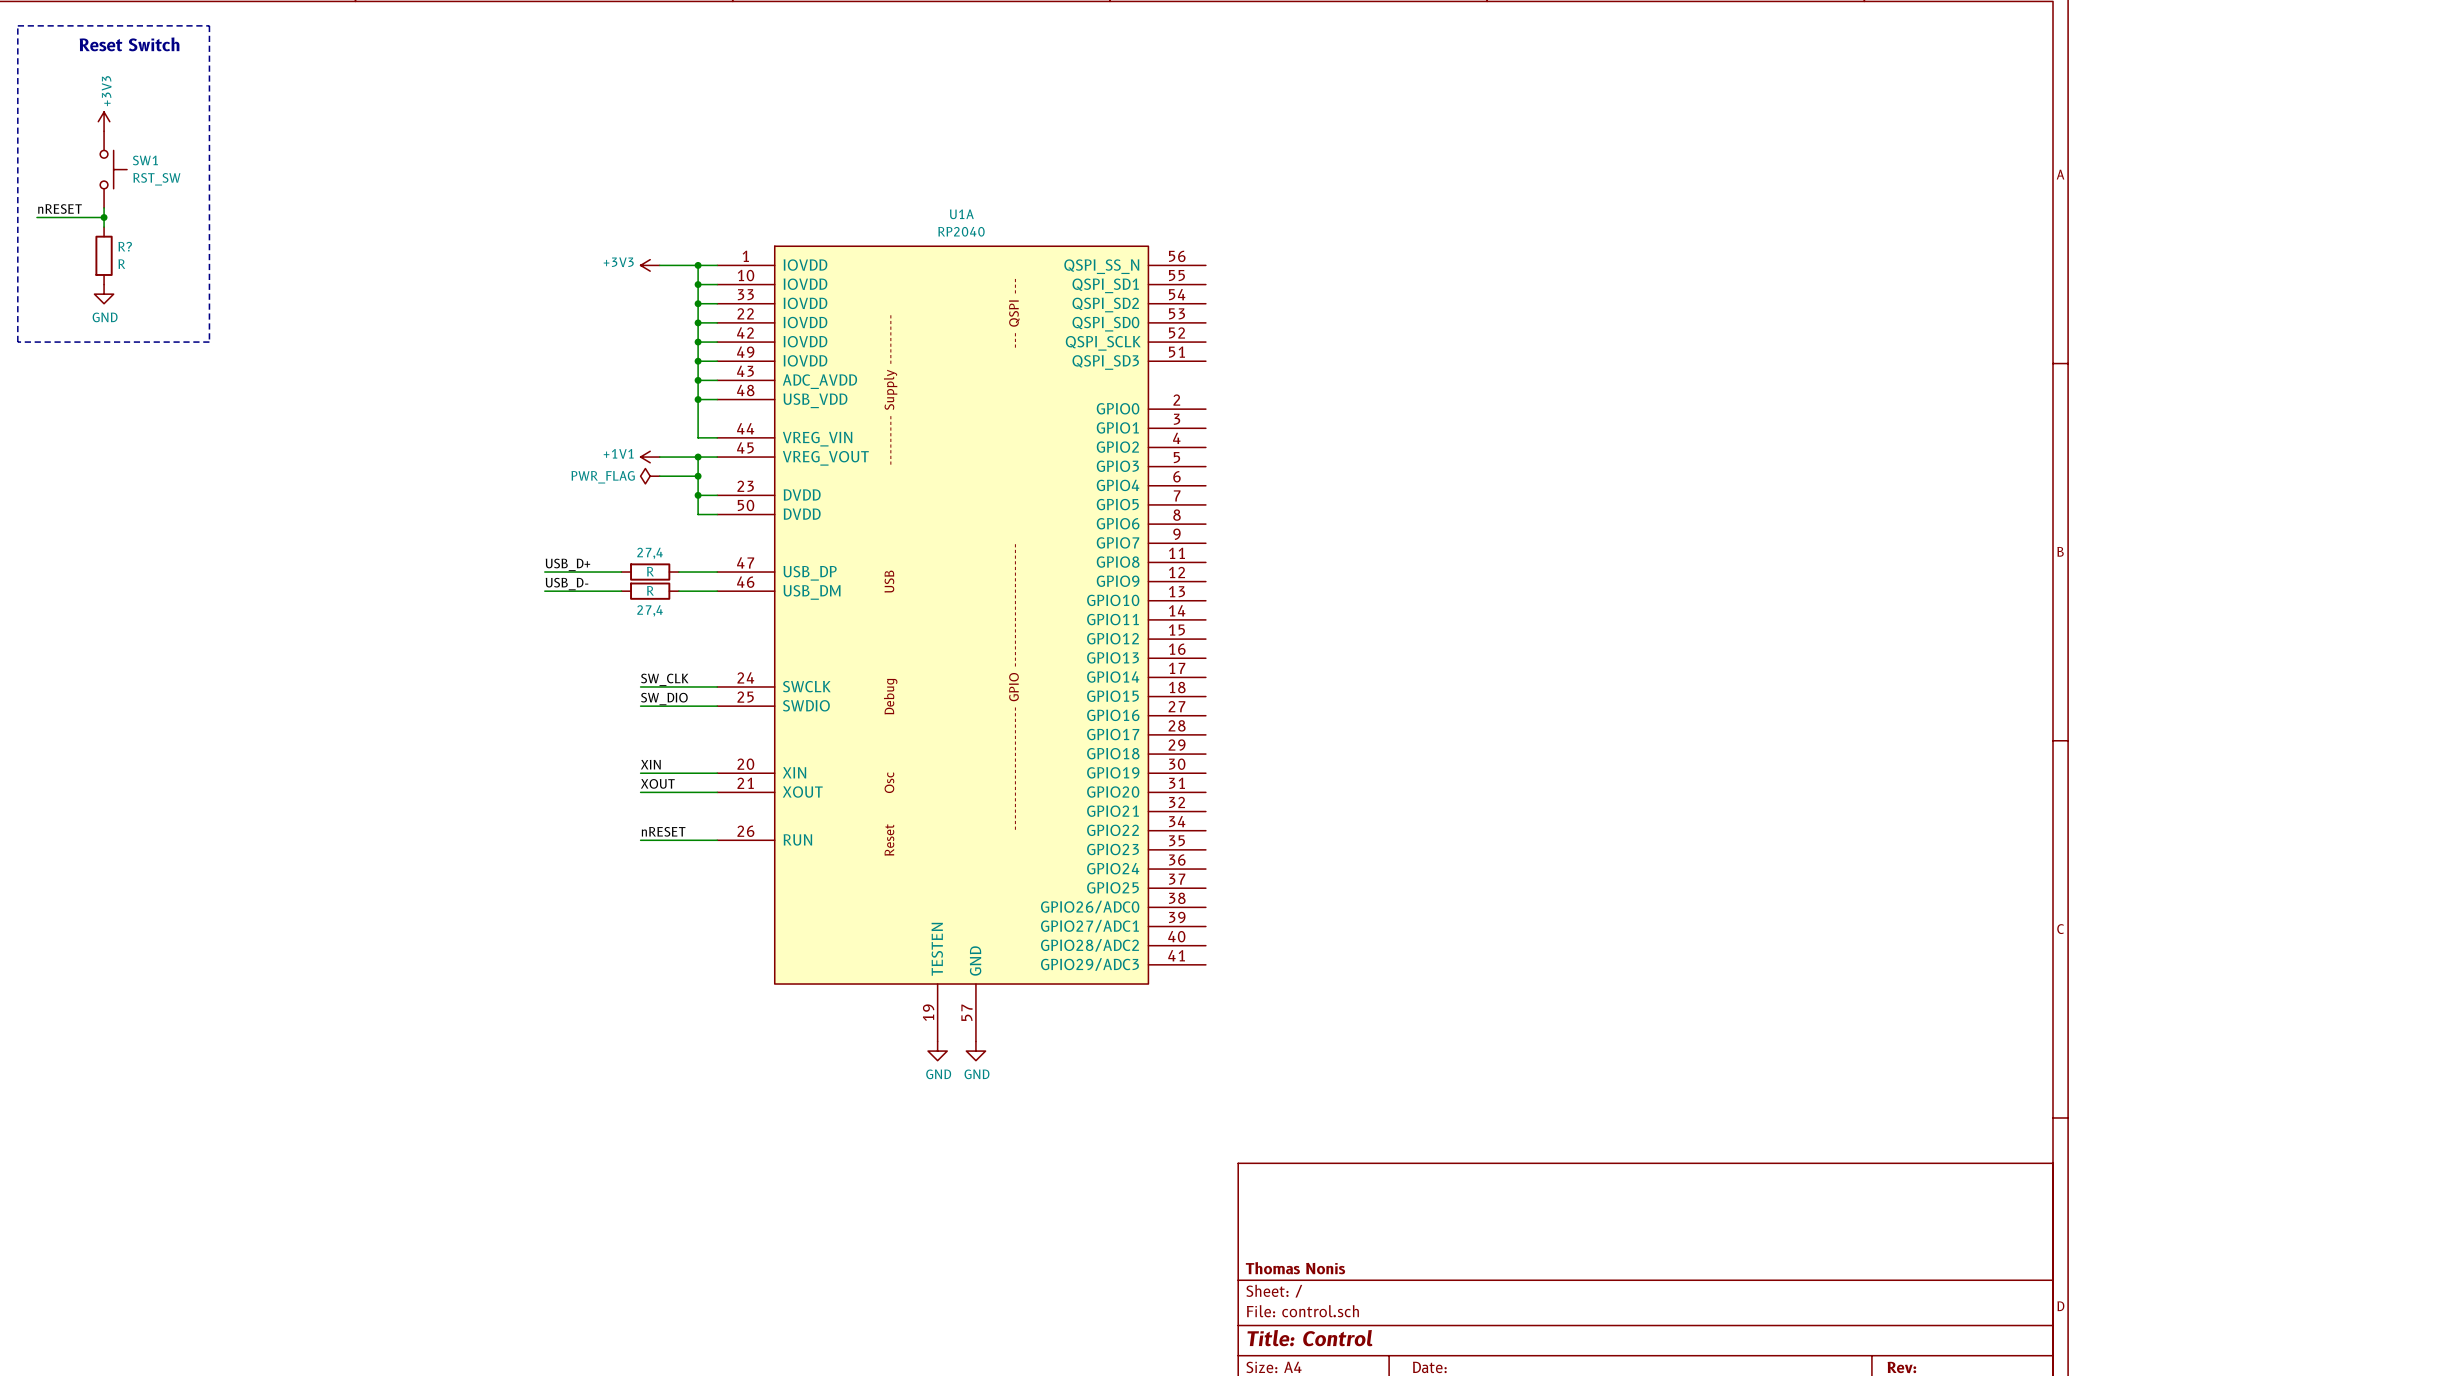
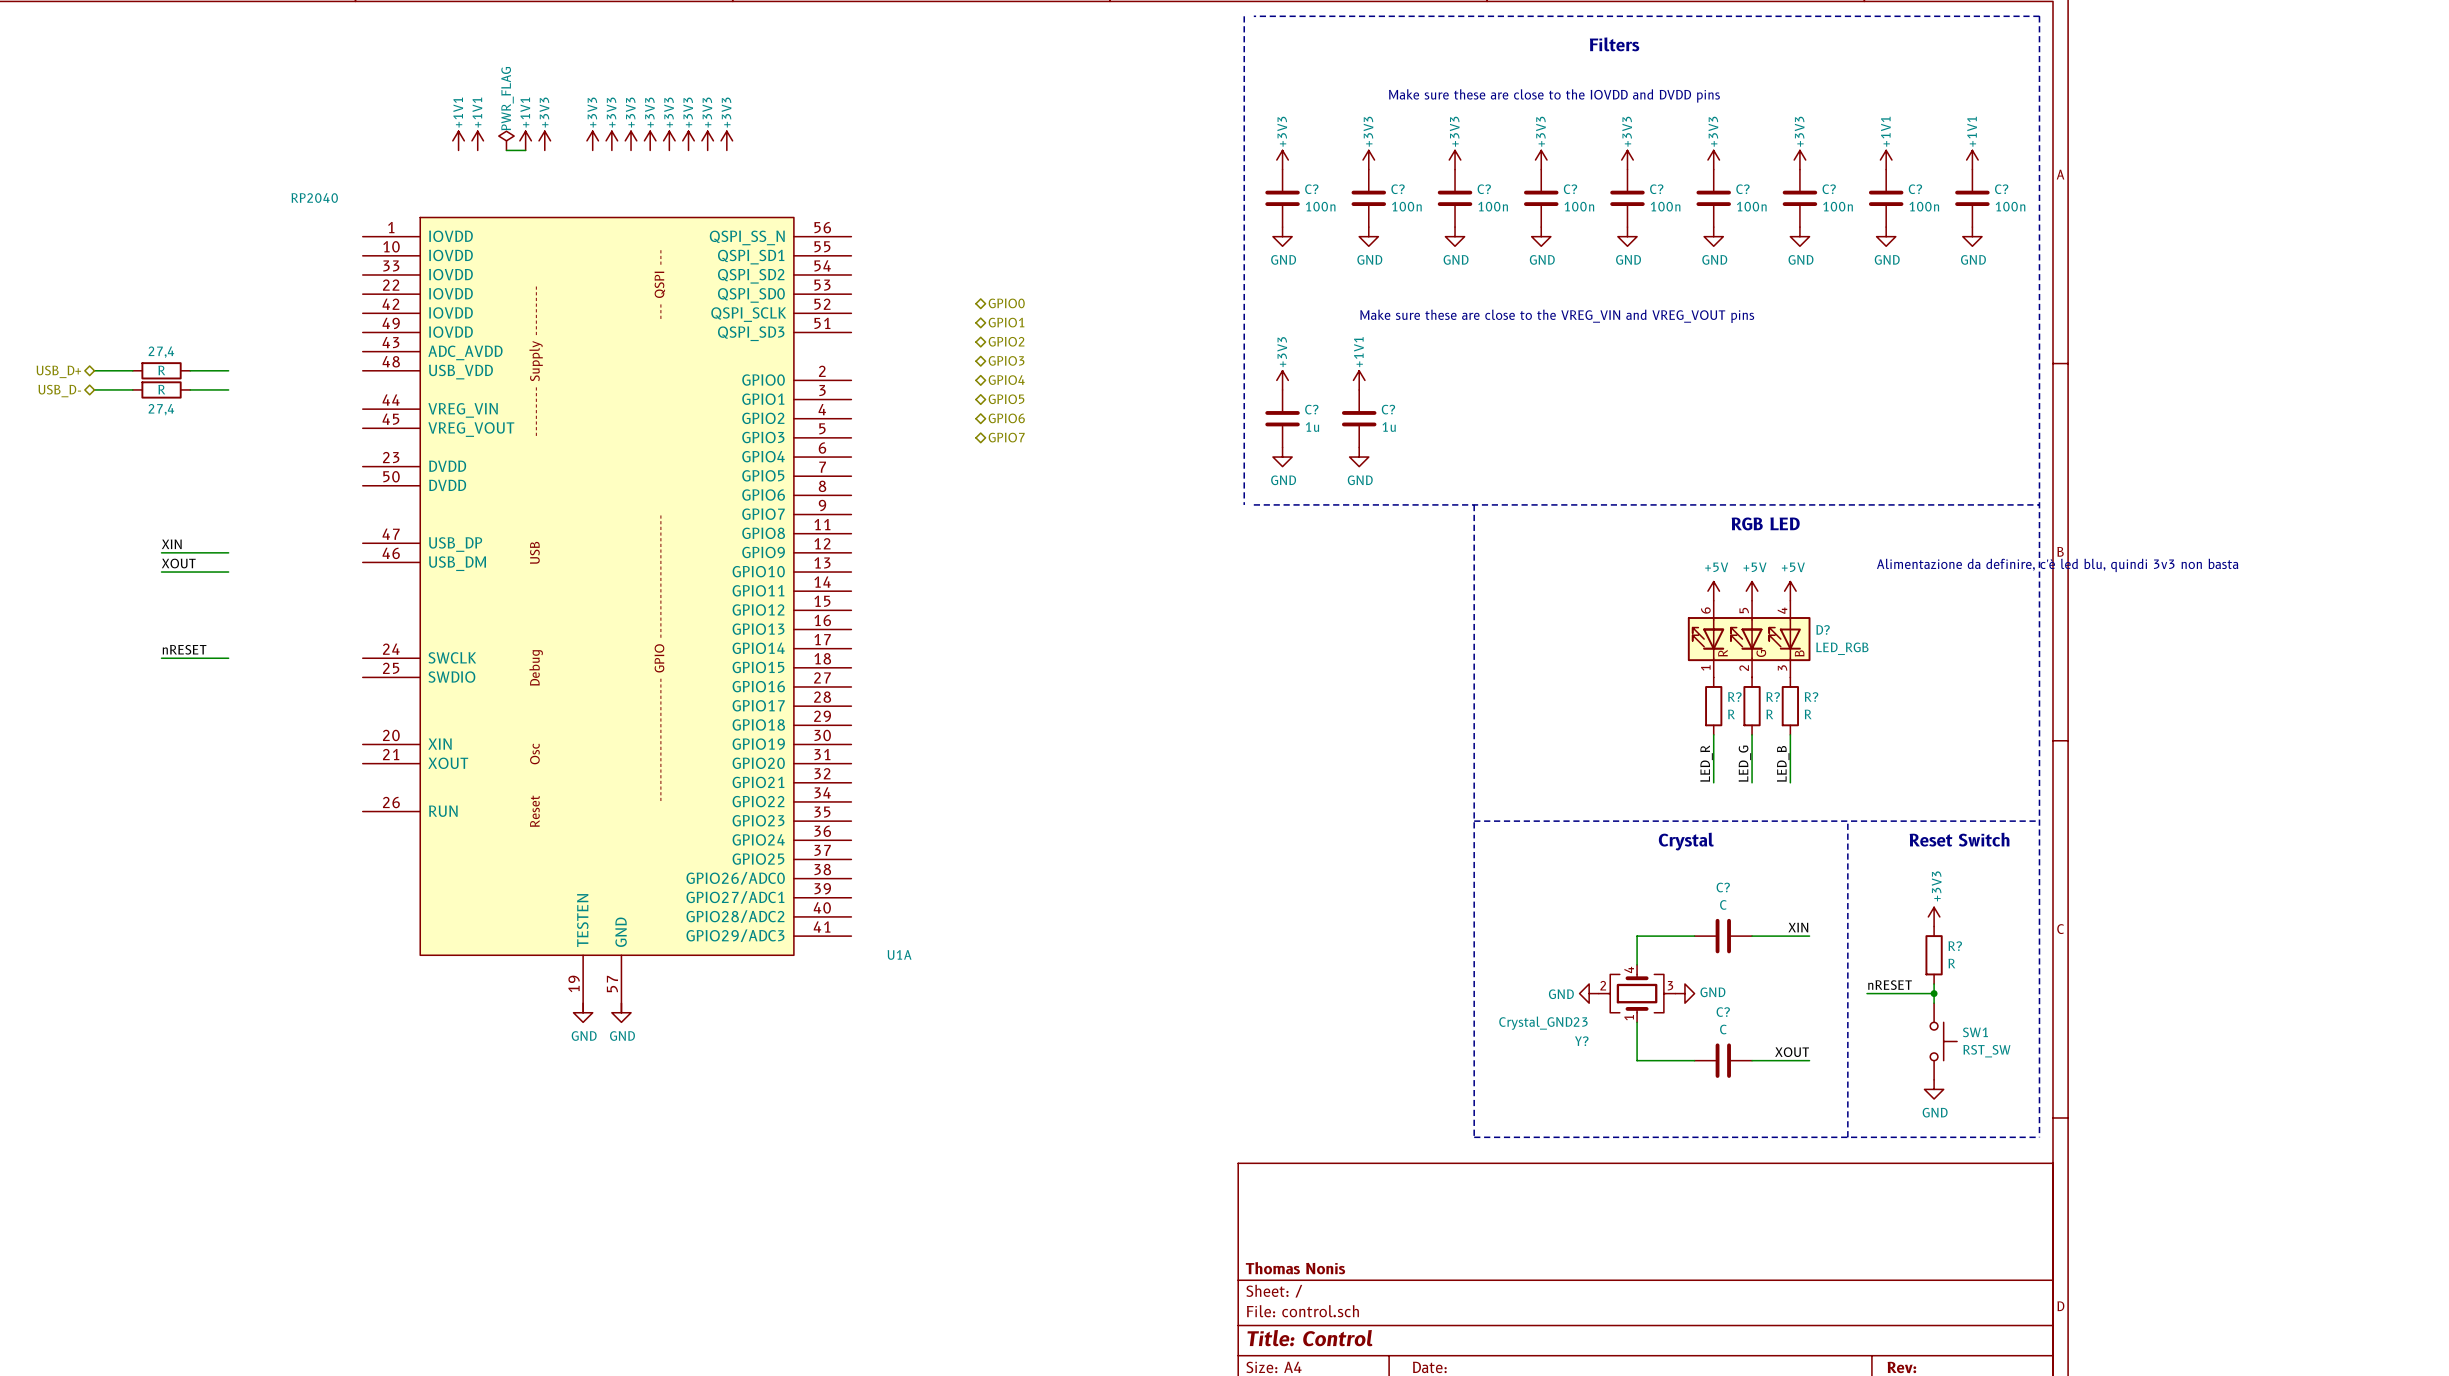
line: none -> (1244, 16) (1244, 504)
line: none -> (1253, 16) (2039, 16) (2039, 1137) (1474, 1137) (1474, 504)
line: (17, 25) (209, 25) (209, 342) (17, 342) (17, 25) -> none
text: Reset Switch (129, 44) -> none
text: none -> Filters (1614, 44)
text: none -> Make sure these are close to the IOVDD and DVDD pins (1554, 95)
power symbol: +3V3 (104, 121) -> none
power symbol: none -> +1V1 (458, 140)
power symbol: none -> +1V1 (477, 140)
power symbol: none -> PWR_FLAG (506, 140)
power symbol: none -> +1V1 (525, 140)
power symbol: none -> +3V3 (544, 140)
power symbol: none -> +3V3 (592, 140)
power symbol: none -> +3V3 (611, 140)
power symbol: none -> +3V3 (631, 140)
power symbol: none -> +3V3 (650, 140)
power symbol: none -> +3V3 (669, 140)
power symbol: none -> +3V3 (688, 140)
power symbol: none -> +3V3 (707, 140)
power symbol: none -> +3V3 (726, 140)
wire: none -> (506, 150) (525, 150)
power symbol: none -> +3V3 (1282, 160)
power symbol: none -> +3V3 (1368, 160)
power symbol: none -> +3V3 (1455, 160)
power symbol: none -> +3V3 (1541, 160)
power symbol: none -> +3V3 (1627, 160)
power symbol: none -> +3V3 (1713, 160)
power symbol: none -> +3V3 (1799, 160)
power symbol: none -> +1V1 (1886, 160)
power symbol: none -> +1V1 (1972, 160)
SW1 position: (113, 169) -> (1943, 1041)
C?: none -> 100n (1282, 198)
C?: none -> 100n (1368, 198)
C?: none -> 100n (1455, 198)
C?: none -> 100n (1541, 198)
C?: none -> 100n (1627, 198)
C?: none -> 100n (1713, 198)
C?: none -> 100n (1799, 198)
C?: none -> 100n (1886, 198)
C?: none -> 100n (1972, 198)
wire: (104, 207) (104, 227) -> none
label: nRESET (60, 209) -> none
U1A name position: U1A (961, 214) -> U1A (899, 954)
wire: (36, 217) (104, 217) -> none
junction: (104, 217) -> none
U1A value position: RP2040 (961, 231) -> RP2040 (314, 198)
power symbol: none -> GND (1282, 236)
power symbol: none -> GND (1368, 236)
power symbol: none -> GND (1455, 236)
power symbol: none -> GND (1541, 236)
power symbol: none -> GND (1627, 236)
power symbol: none -> GND (1713, 236)
power symbol: none -> GND (1799, 236)
power symbol: none -> GND (1886, 236)
power symbol: none -> GND (1972, 236)
R?: R (104, 255) -> none
power symbol: +3V3 (650, 265) -> none
junction: (698, 265) -> none
junction: (698, 284) -> none
power symbol: GND (104, 294) -> none
junction: (698, 303) -> none
hierarchical label: none -> GPIO0 (1006, 303)
text: none -> Make sure these are close to the VREG_VIN and VREG_VOUT pins (1557, 316)
junction: (698, 322) -> none
hierarchical label: none -> GPIO1 (1006, 322)
hierarchical label: none -> GPIO2 (1006, 341)
junction: (698, 342) -> none
hierarchical label: none -> GPIO3 (1006, 360)
junction: (698, 361) -> none
wire: none -> (94, 370) (132, 370)
27,4: none -> R (161, 370)
wire: none -> (190, 370) (228, 370)
hierarchical label: none -> USB_D+ (58, 371)
junction: (698, 380) -> none
hierarchical label: none -> GPIO4 (1006, 380)
power symbol: none -> +3V3 (1282, 380)
power symbol: none -> +1V1 (1359, 380)
wire: none -> (94, 389) (132, 389)
27,4: none -> R (161, 389)
wire: none -> (190, 389) (228, 389)
hierarchical label: none -> USB_D- (59, 391)
junction: (698, 399) -> none
hierarchical label: none -> GPIO5 (1006, 399)
hierarchical label: none -> GPIO6 (1006, 418)
C?: none -> 1u (1282, 418)
C?: none -> 1u (1359, 418)
hierarchical label: none -> GPIO7 (1006, 437)
power symbol: +1V1 (650, 457) -> none
junction: (698, 457) -> none
power symbol: none -> GND (1282, 457)
power symbol: none -> GND (1359, 457)
power symbol: PWR_FLAG (650, 476) -> none
junction: (698, 476) -> none
junction: (698, 495) -> none
line: none -> (1253, 504) (2039, 504)
text: none -> RGB LED (1765, 523)
label: none -> XIN (171, 544)
wire: none -> (161, 552) (228, 552)
label: none -> XOUT (178, 563)
label: USB_D+ (567, 564) -> none
text: none -> Alimentazione da definire, c'è led blu, quindi 3v3 non basta (2057, 565)
wire: none -> (161, 572) (228, 572)
27,4: R (650, 572) -> none
label: USB_D- (567, 584) -> none
27,4: R (650, 591) -> none
power symbol: none -> +5V (1713, 591)
power symbol: none -> +5V (1752, 591)
power symbol: none -> +5V (1790, 591)
D?: none -> LED_RGB (1749, 639)
U1A position: (961, 643) -> (607, 614)
label: none -> nRESET (184, 649)
wire: none -> (161, 658) (228, 658)
label: SW_CLK (664, 679) -> none
label: SW_DIO (664, 699) -> none
R?: none -> R (1713, 706)
R?: none -> R (1752, 706)
R?: none -> R (1790, 706)
wire: none -> (1713, 734) (1713, 782)
wire: none -> (1752, 734) (1752, 782)
wire: none -> (1790, 734) (1790, 782)
label: none -> LED_R (1706, 763)
label: none -> LED_G (1744, 763)
label: none -> LED_B (1783, 763)
label: XIN (650, 764) -> none
label: XOUT (657, 783) -> none
line: none -> (1474, 821) (2039, 821)
line: none -> (1847, 821) (1847, 1137)
label: nRESET (663, 831) -> none
text: none -> Reset Switch (1959, 839)
text: none -> Crystal (1686, 841)
power symbol: none -> +3V3 (1934, 916)
label: none -> XIN (1798, 927)
wire: none -> (1694, 936) (1637, 936) (1637, 964)
C?: none -> C (1723, 936)
wire: none -> (1752, 936) (1809, 936)
R?: none -> R (1934, 955)
wire: none -> (1934, 984) (1934, 1003)
label: none -> nRESET (1890, 985)
power symbol: none -> GND (1589, 993)
Y?: none -> Crystal_GND23 (1637, 993)
power symbol: none -> GND (1684, 993)
wire: none -> (1867, 993) (1934, 993)
junction: none -> (1934, 993)
power symbol: none -> GND (583, 1012)
power symbol: none -> GND (621, 1012)
wire: none -> (1637, 1022) (1637, 1060) (1694, 1060)
power symbol: GND (937, 1051) -> none
power symbol: GND (975, 1051) -> none
label: none -> XOUT (1792, 1052)
C?: none -> C (1723, 1060)
wire: none -> (1752, 1060) (1809, 1060)
power symbol: none -> GND (1934, 1089)

